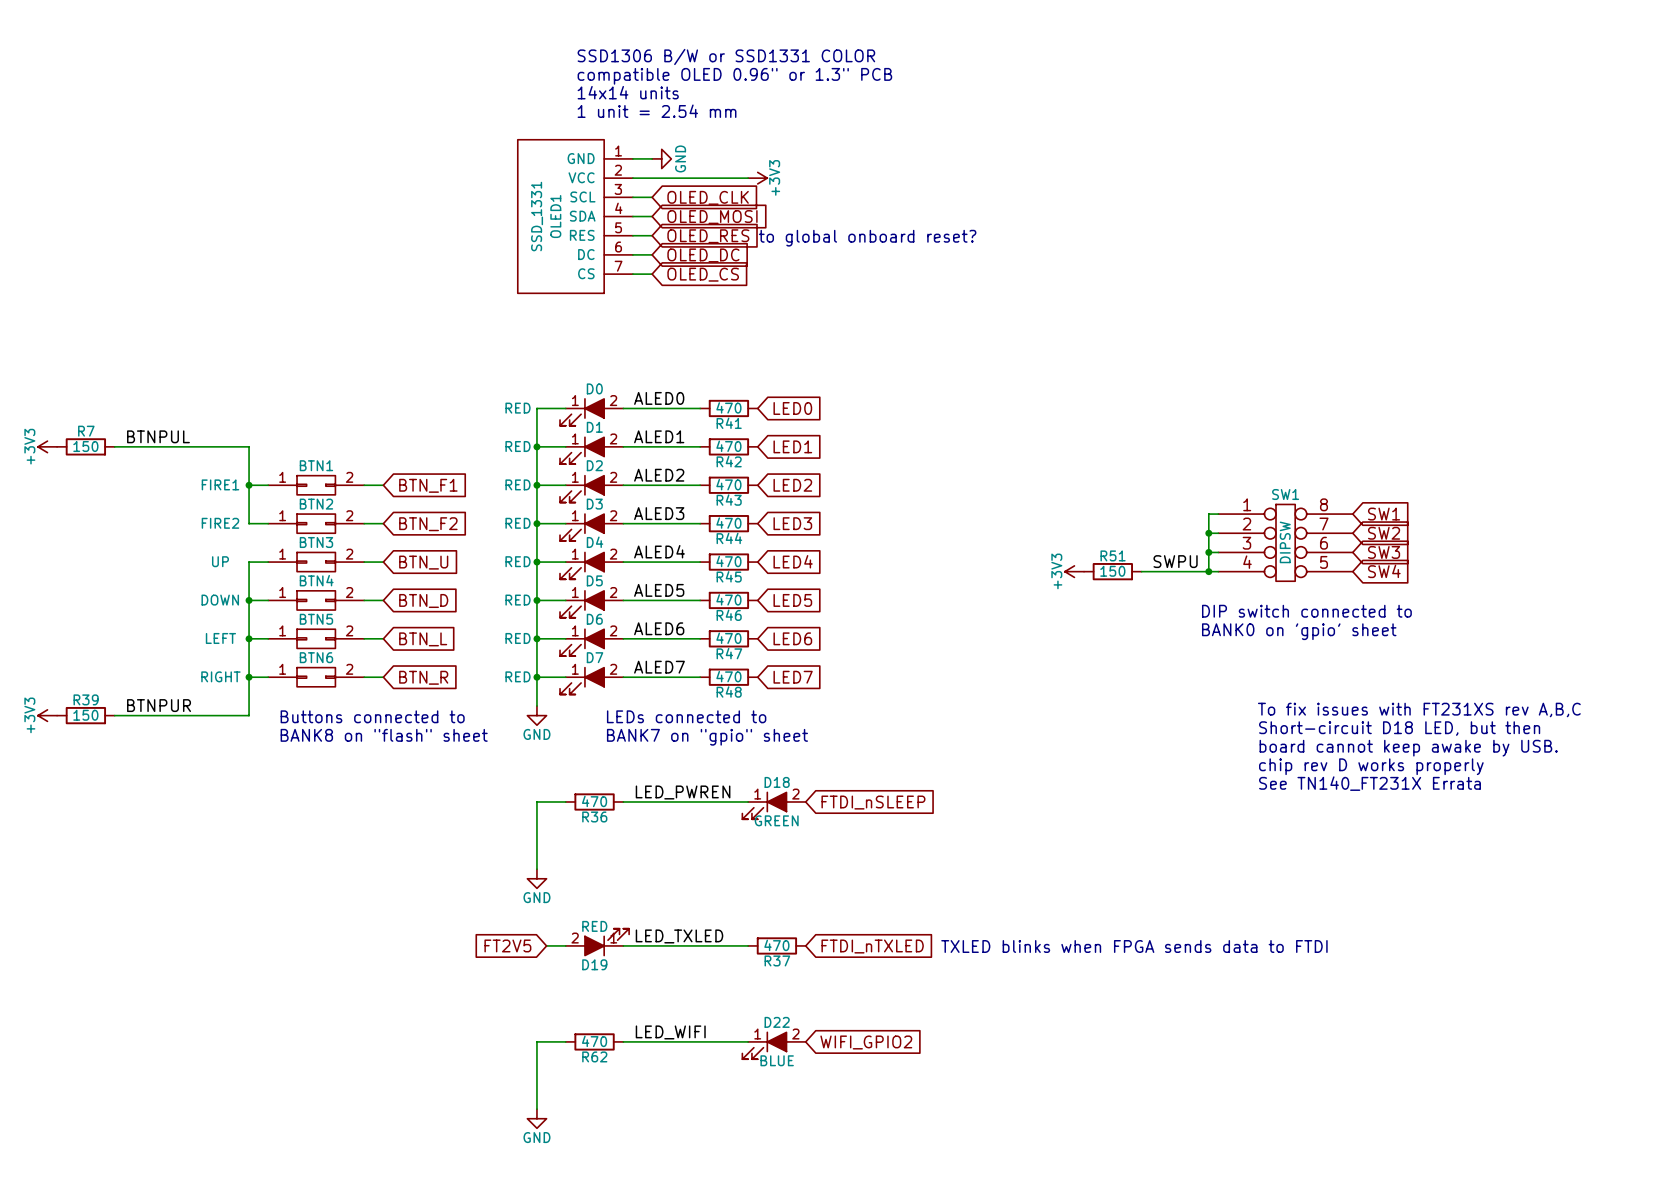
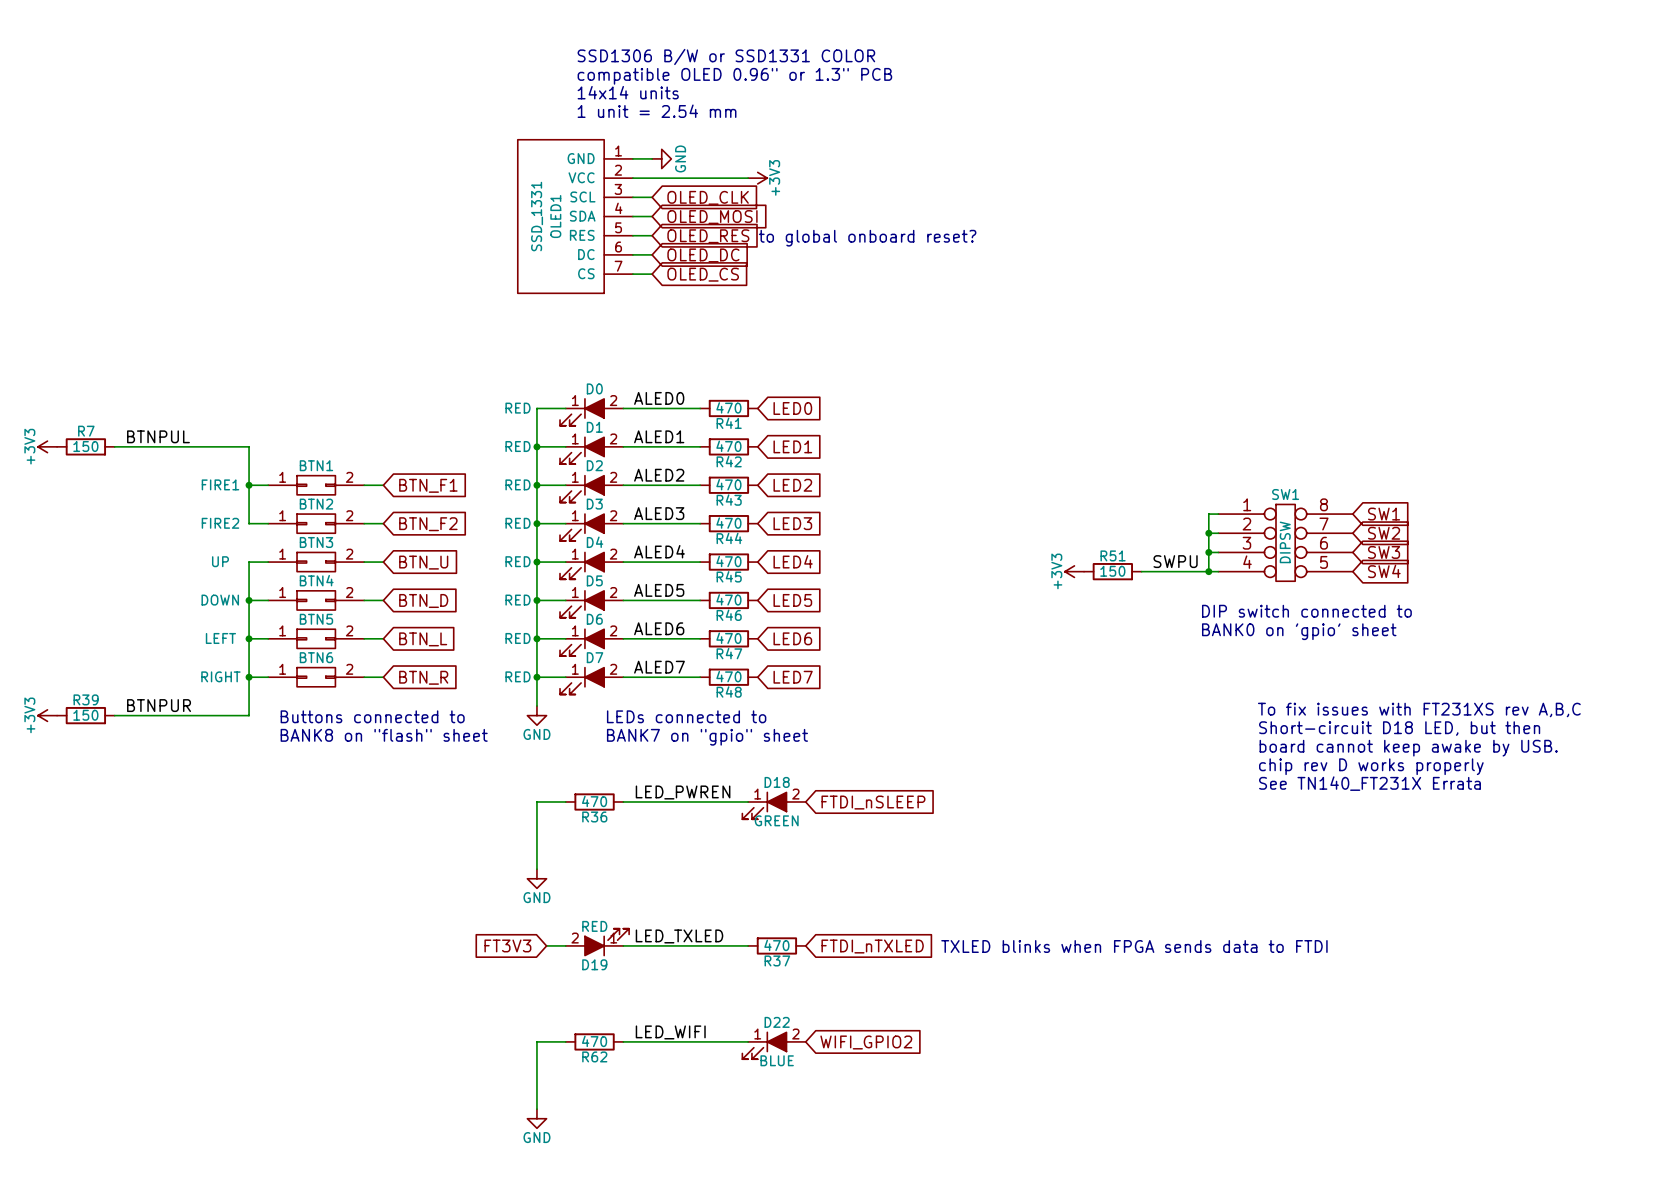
global label: FT2V5 (507, 945) -> FT3V3 (507, 945)

